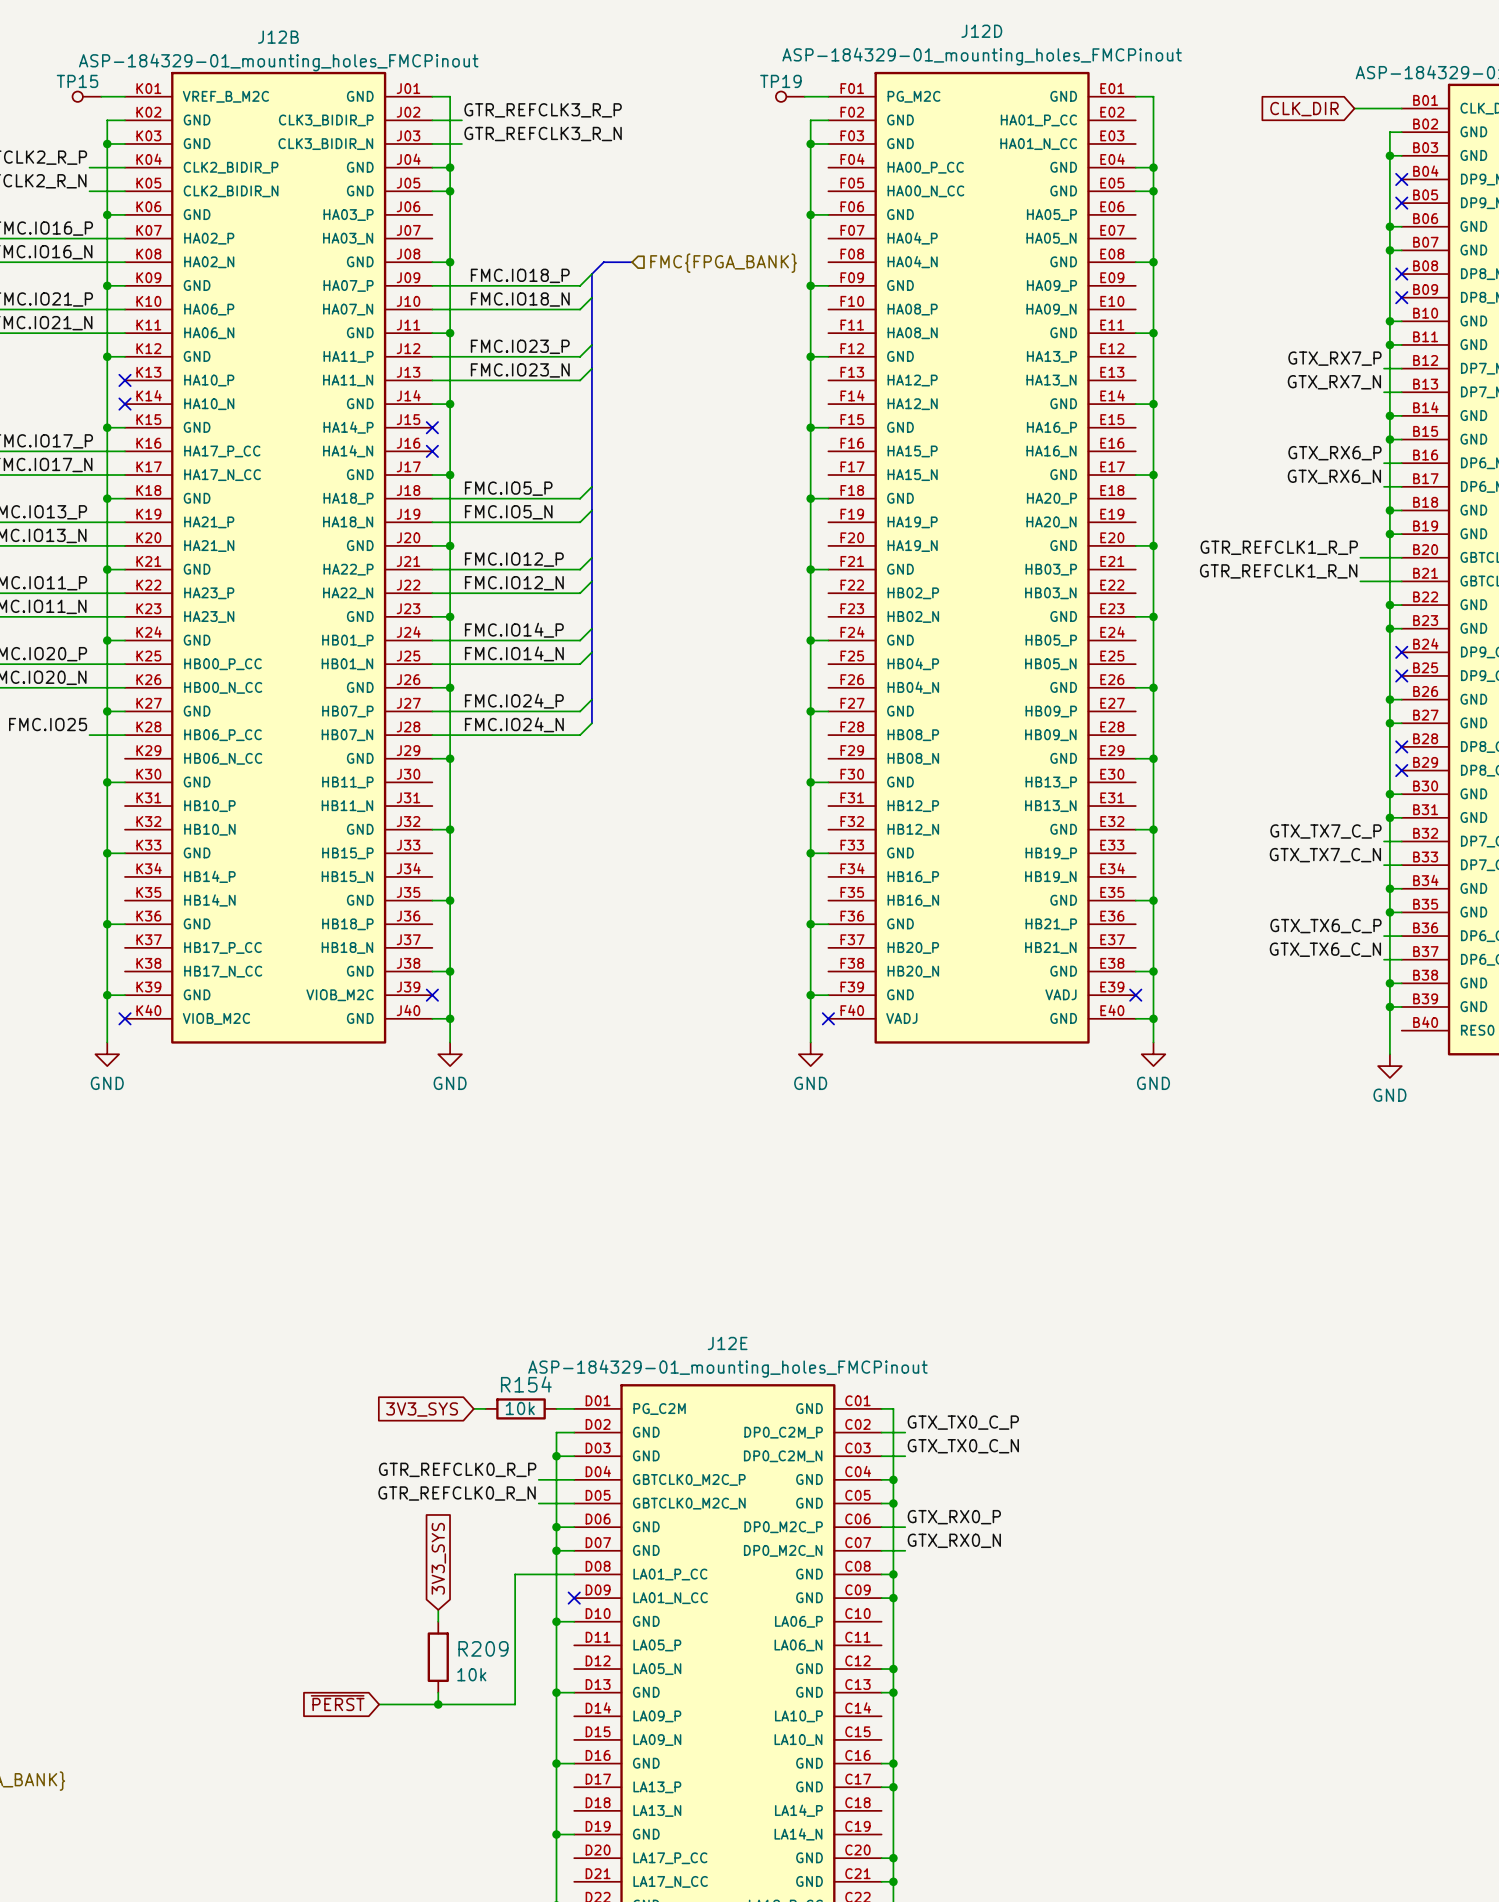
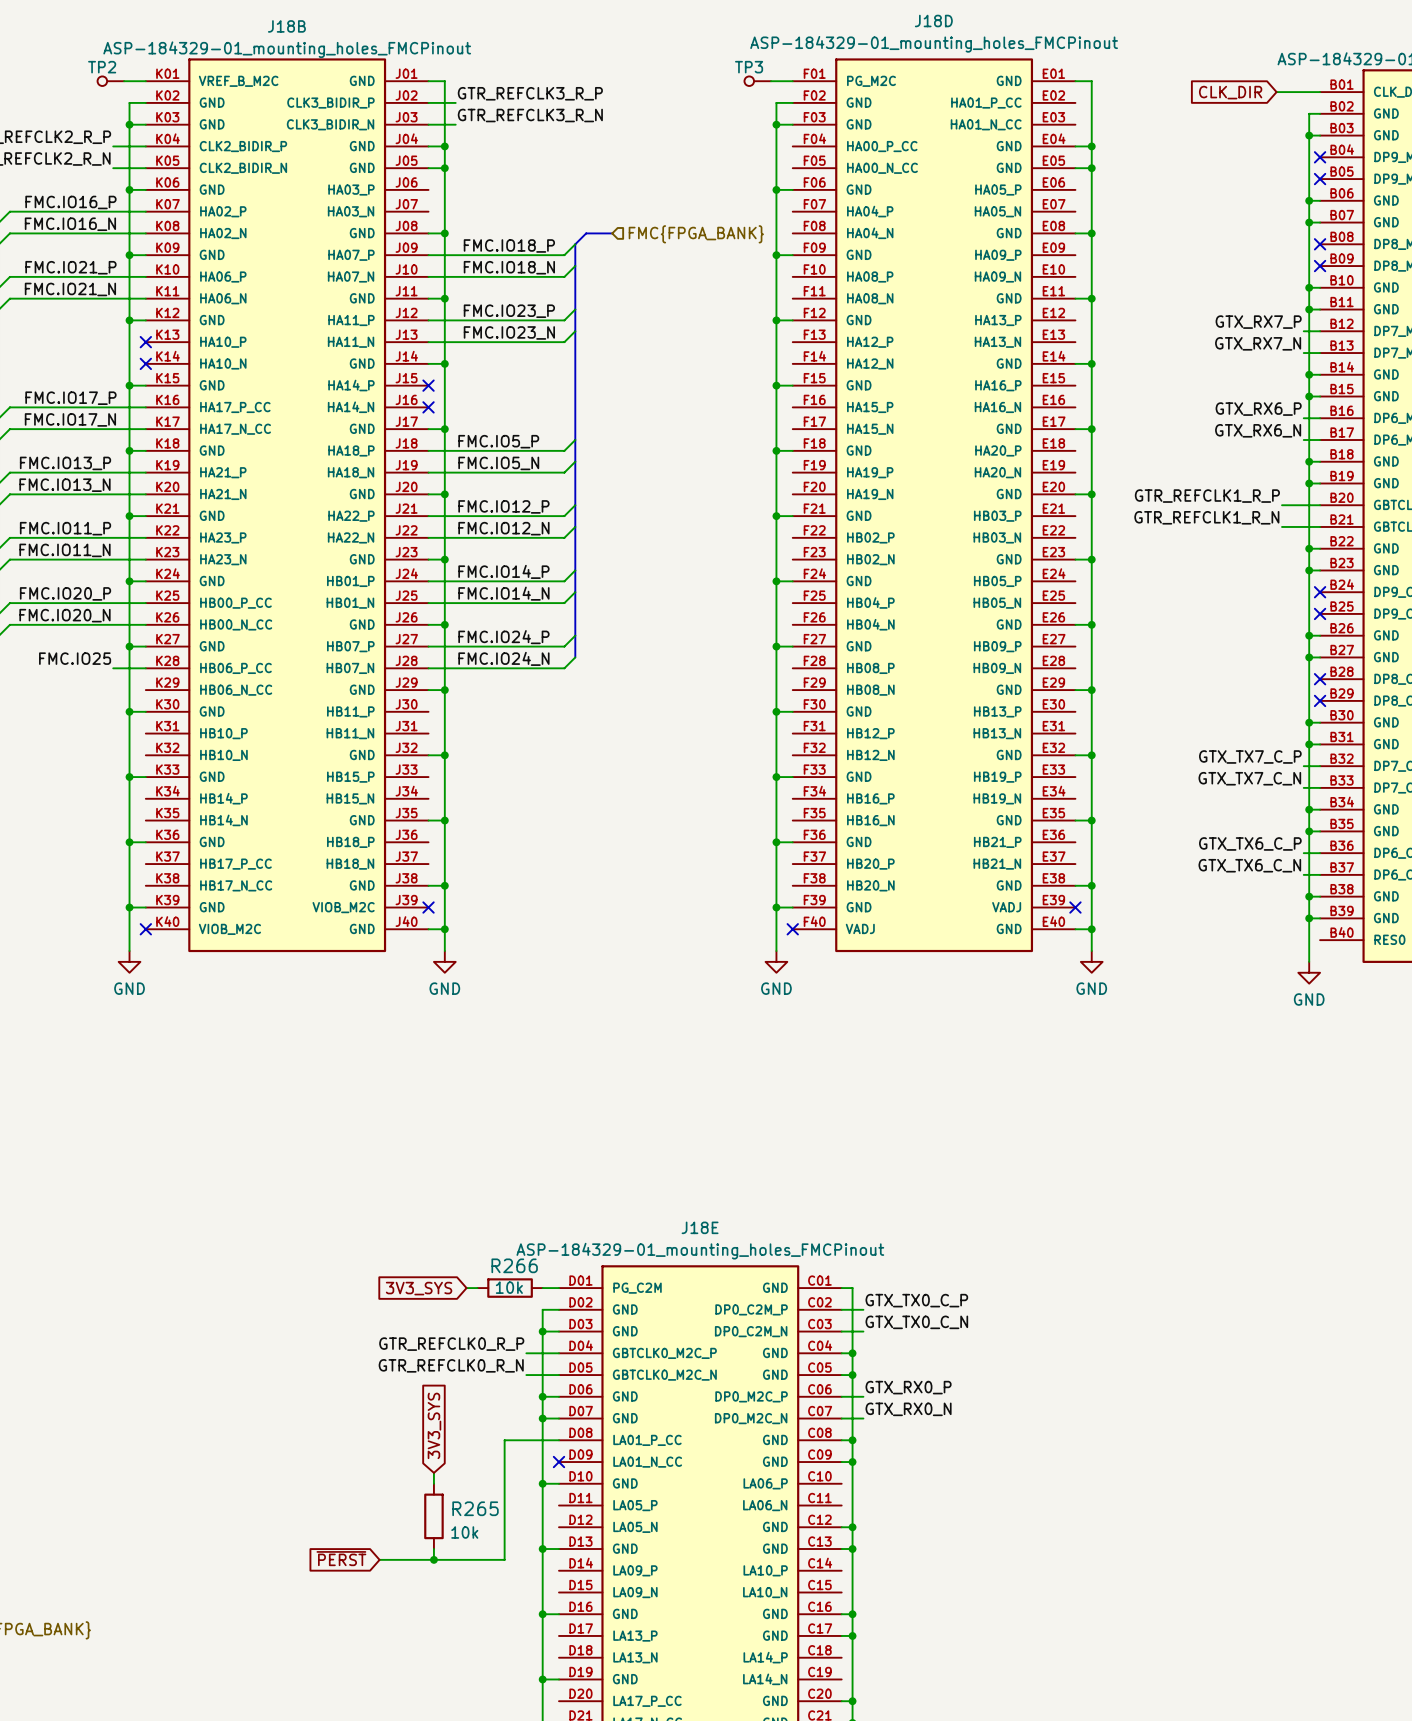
J12D name: J12D (981, 31) -> J18D (933, 21)
J12B name: J12B (278, 37) -> J18B (286, 26)
TP15 name: TP15 (77, 81) -> TP2 (102, 67)
TP19 name: TP19 (780, 81) -> TP3 (749, 67)
J12E name: J12E (727, 1343) -> J18E (700, 1227)
R154 name: R154 (526, 1384) -> R266 (514, 1265)
R209 name: R209 (483, 1648) -> R265 (475, 1508)

